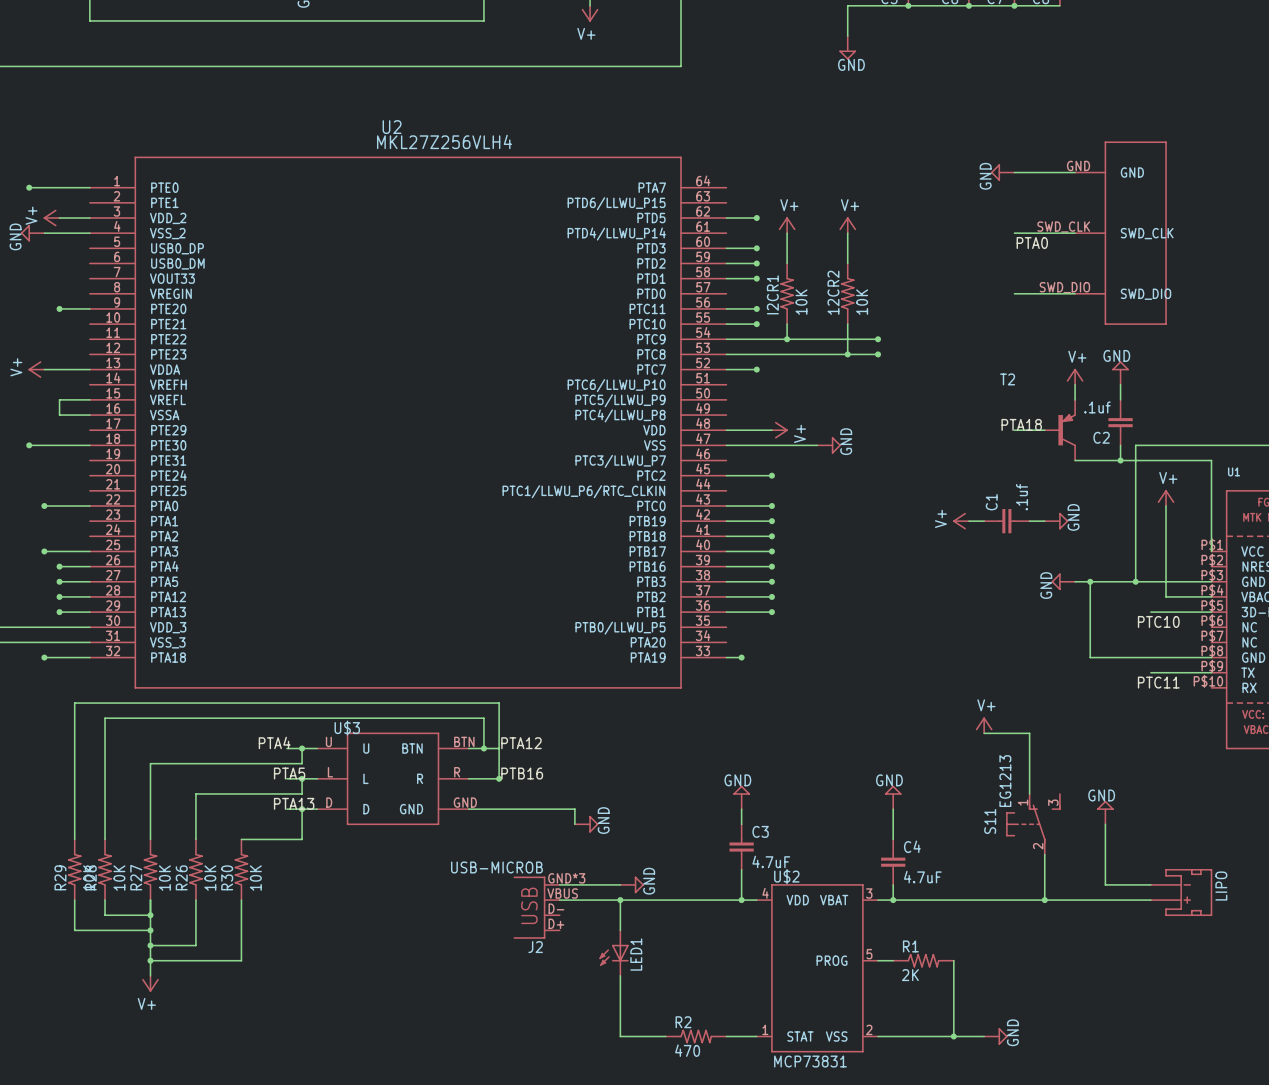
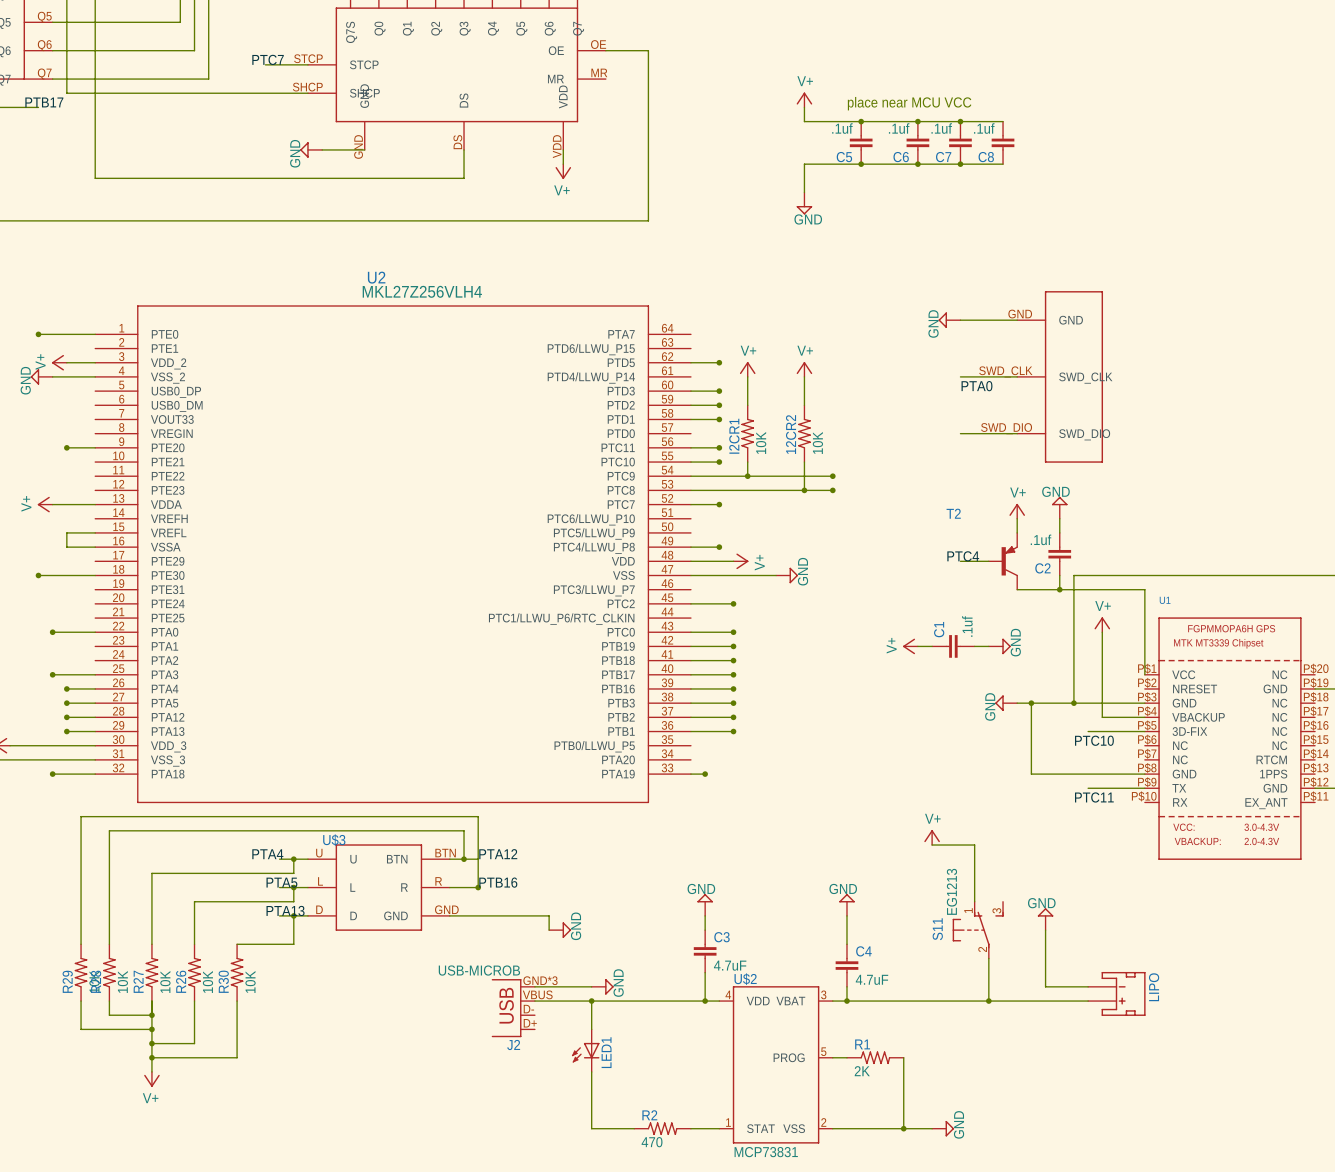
wire: none -> (690, 547) (719, 547)
junction: none -> (719, 547)
label: PTA18 (1021, 424) -> PTC4 (963, 556)

